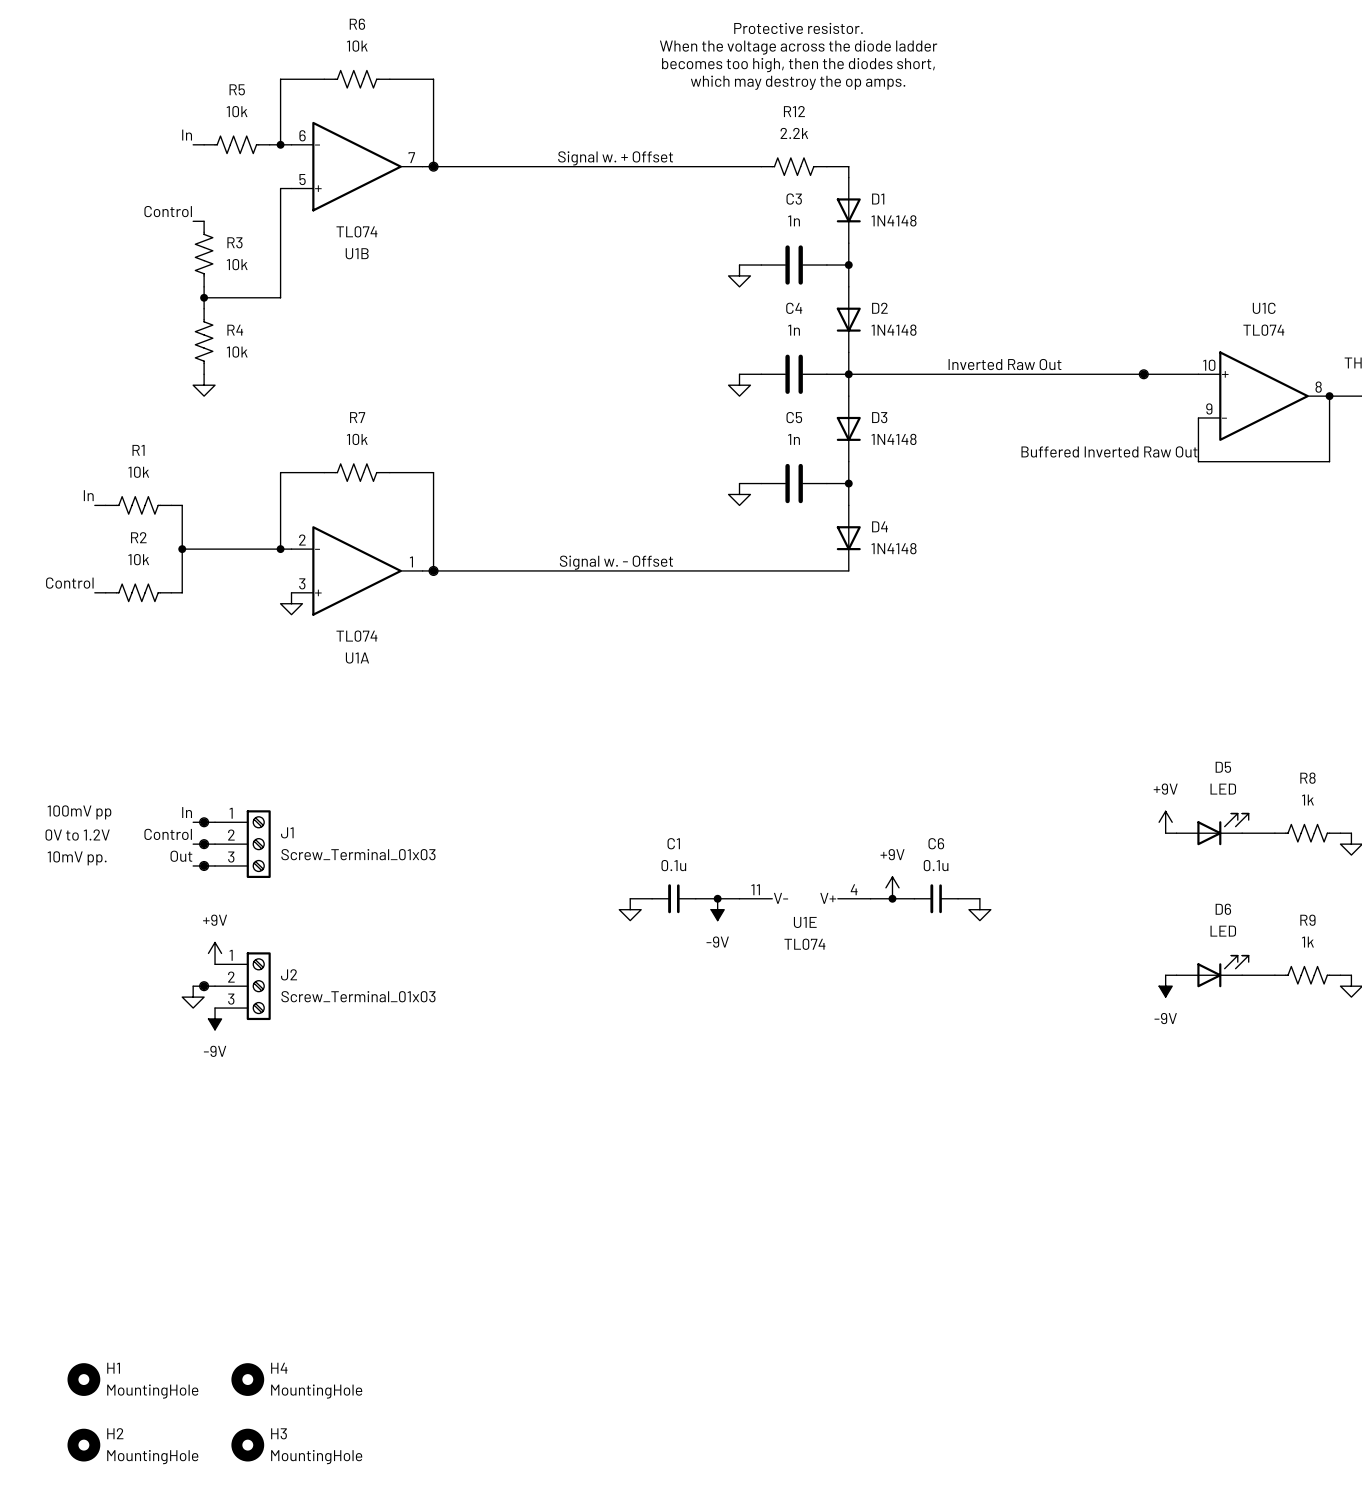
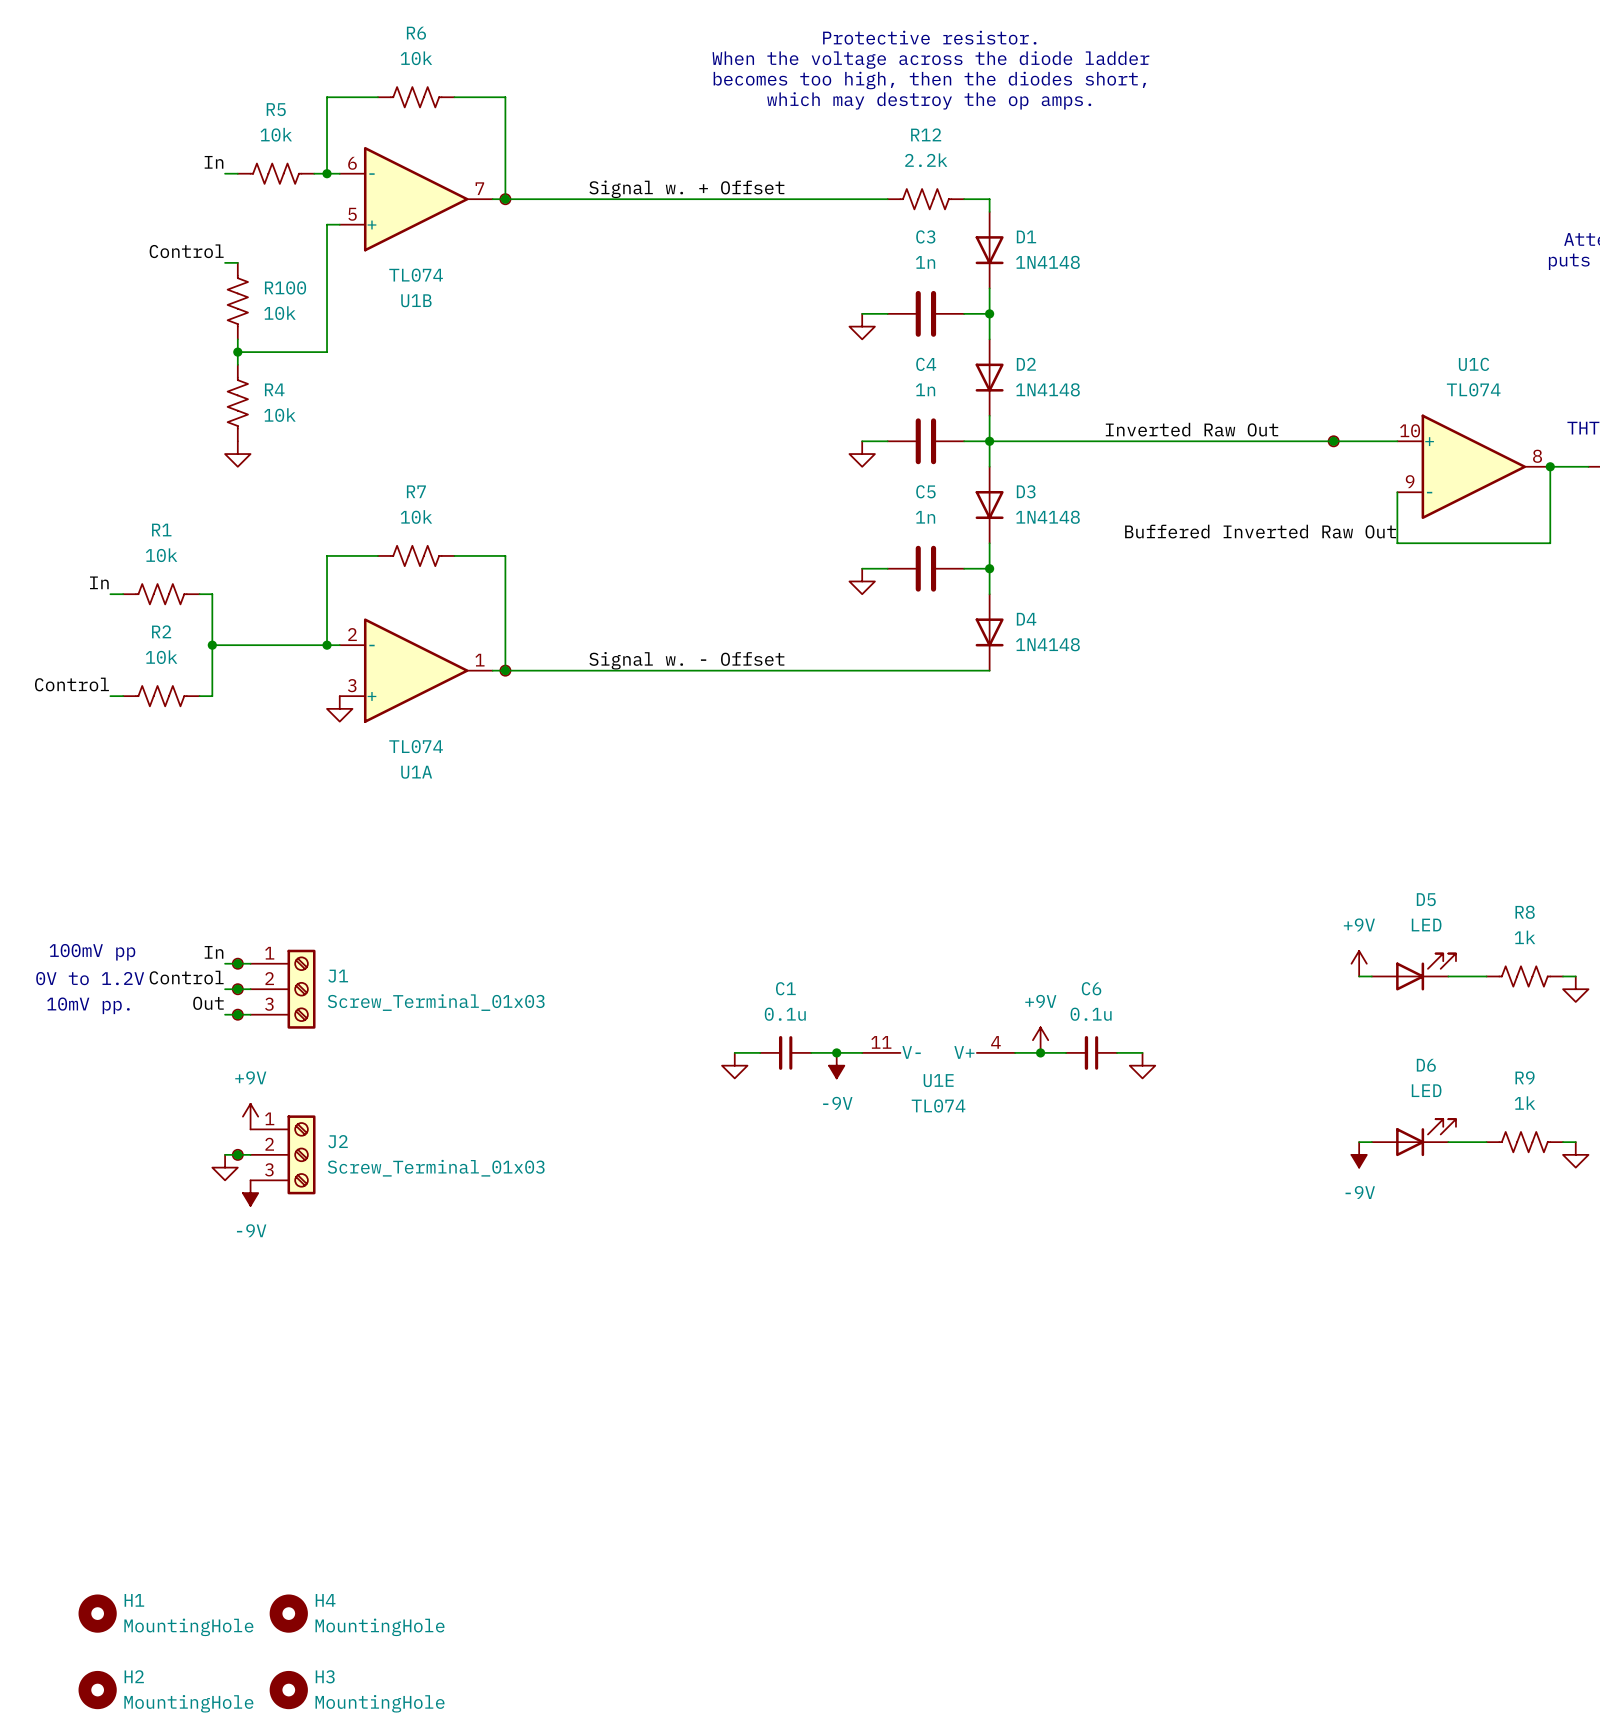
R3 name: R3 (234, 242) -> R100 (285, 287)

